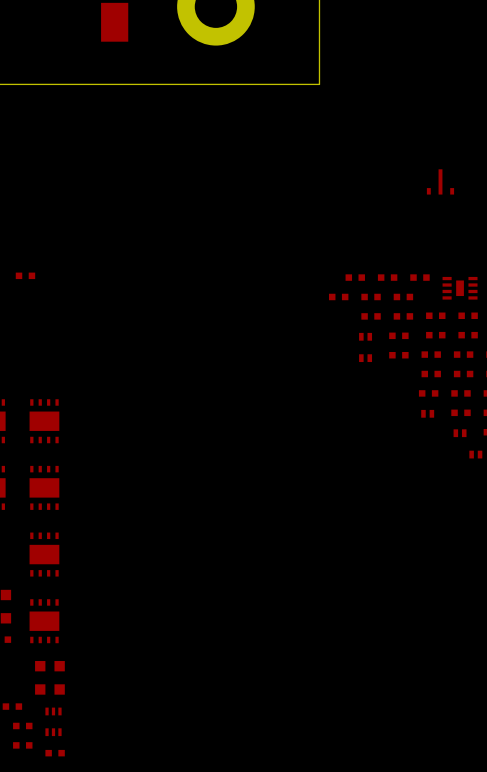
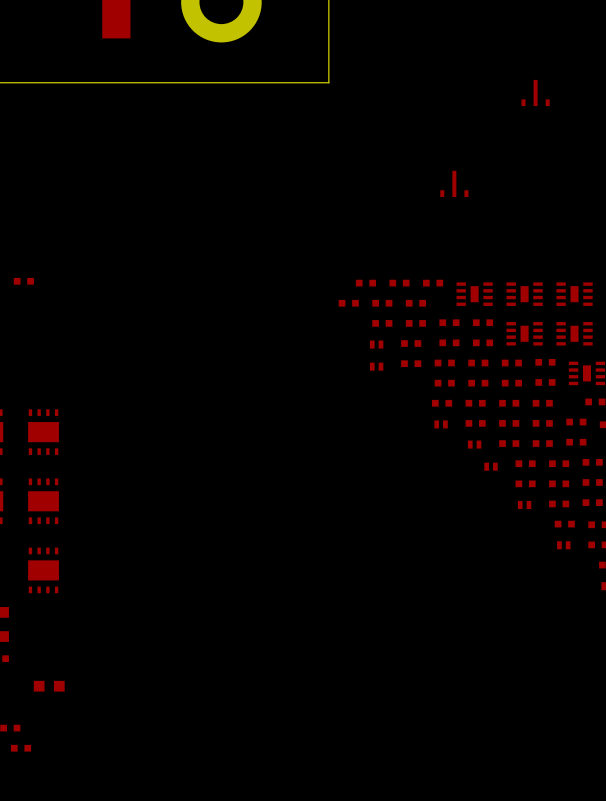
part: (44, 621) -> none
part: (49, 689) -> none
part: (53, 721) -> none
part: (22, 745) -> none
part: (55, 753) -> none

